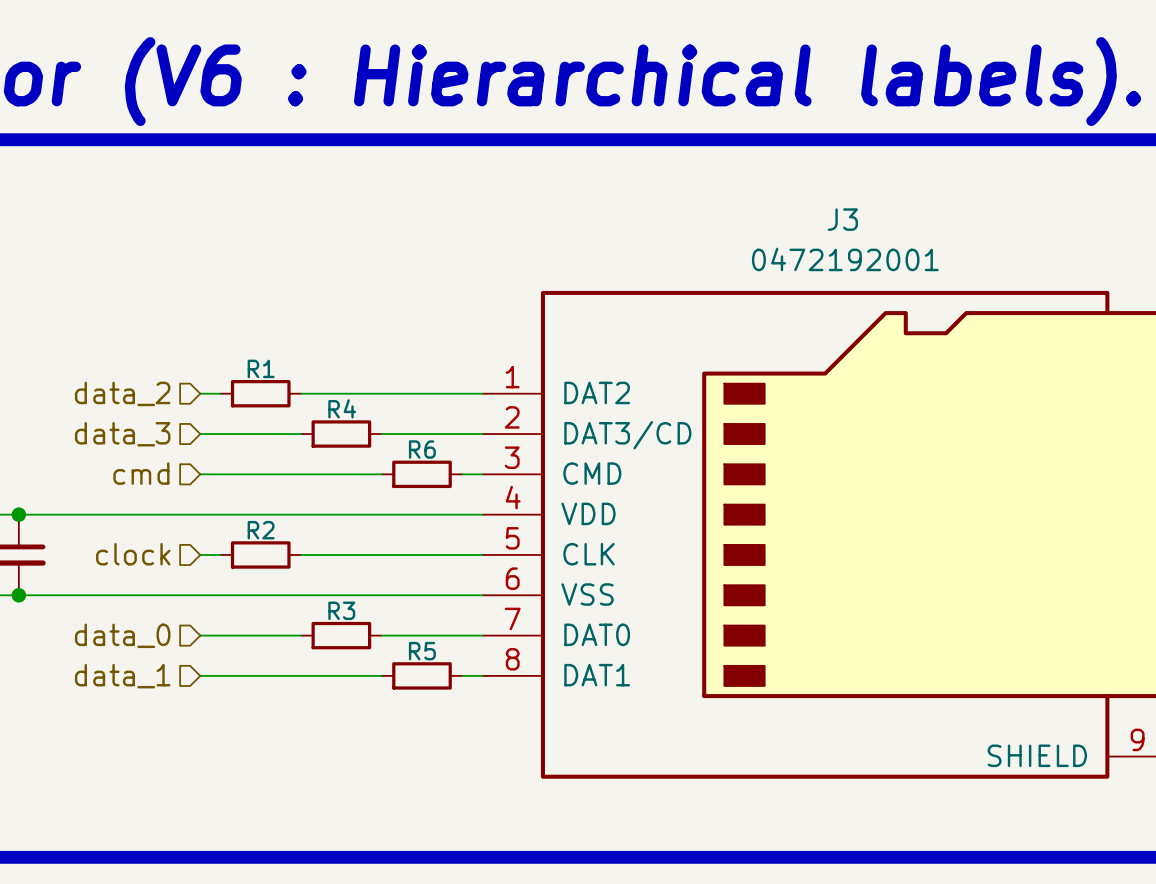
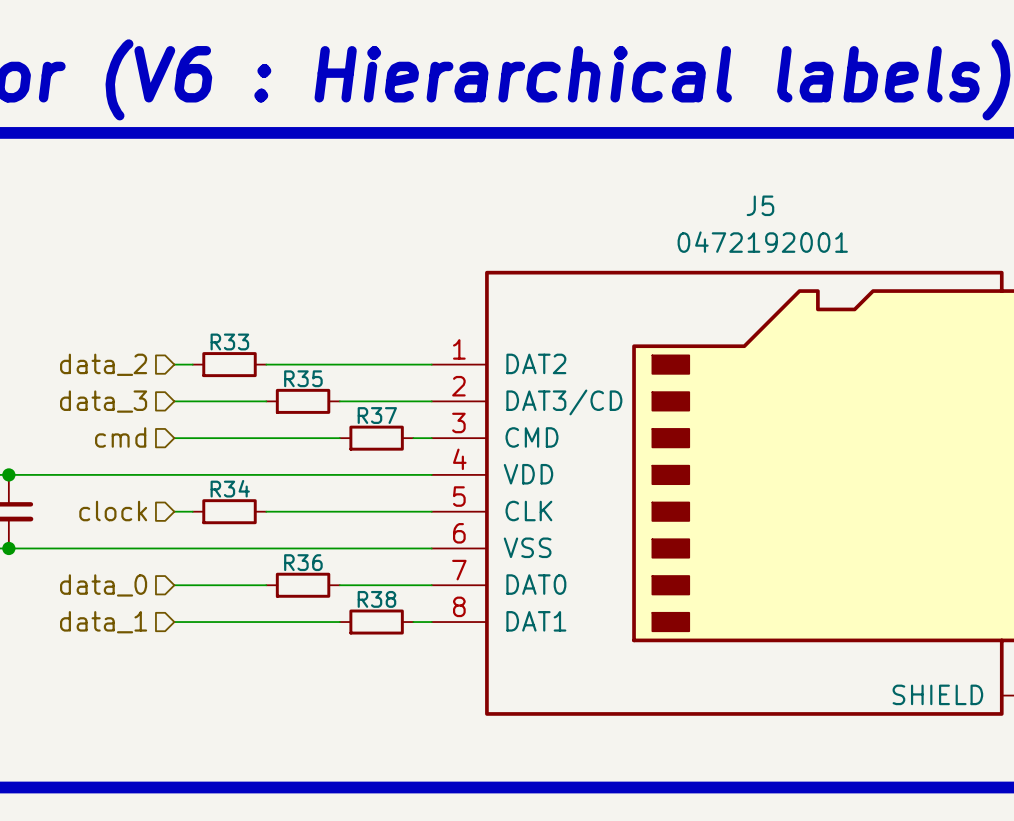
J3 name: J3 (842, 219) -> J5 (760, 205)
R1 name: R1 (261, 368) -> R33 (229, 341)
R4 name: R4 (342, 408) -> R35 (303, 378)
R6 name: R6 (422, 449) -> R37 (377, 415)
R2 name: R2 (261, 530) -> R34 (230, 488)
R3 name: R3 (341, 610) -> R36 (303, 562)
R5 name: R5 (422, 651) -> R38 (376, 599)

